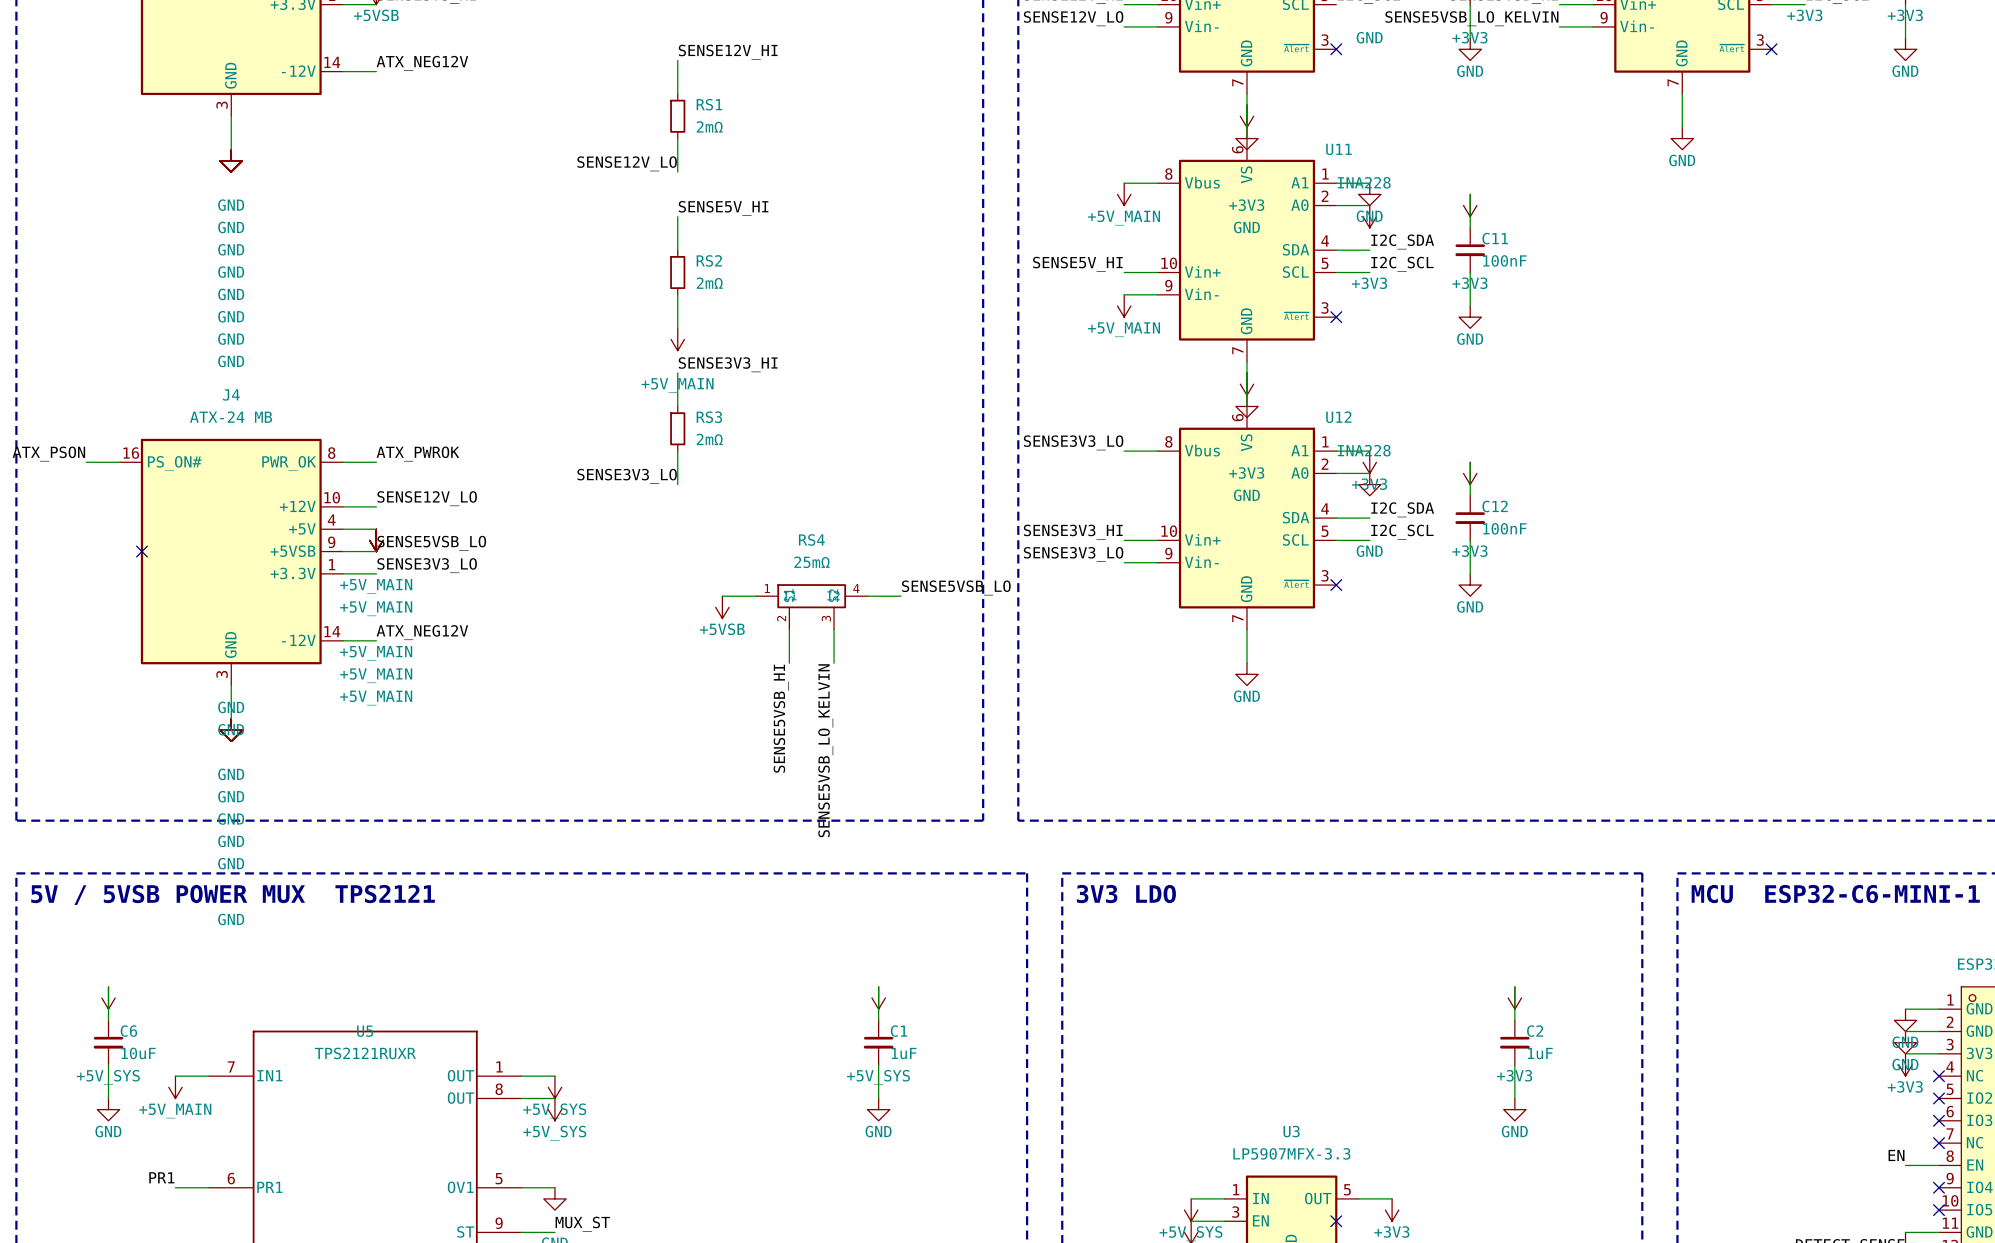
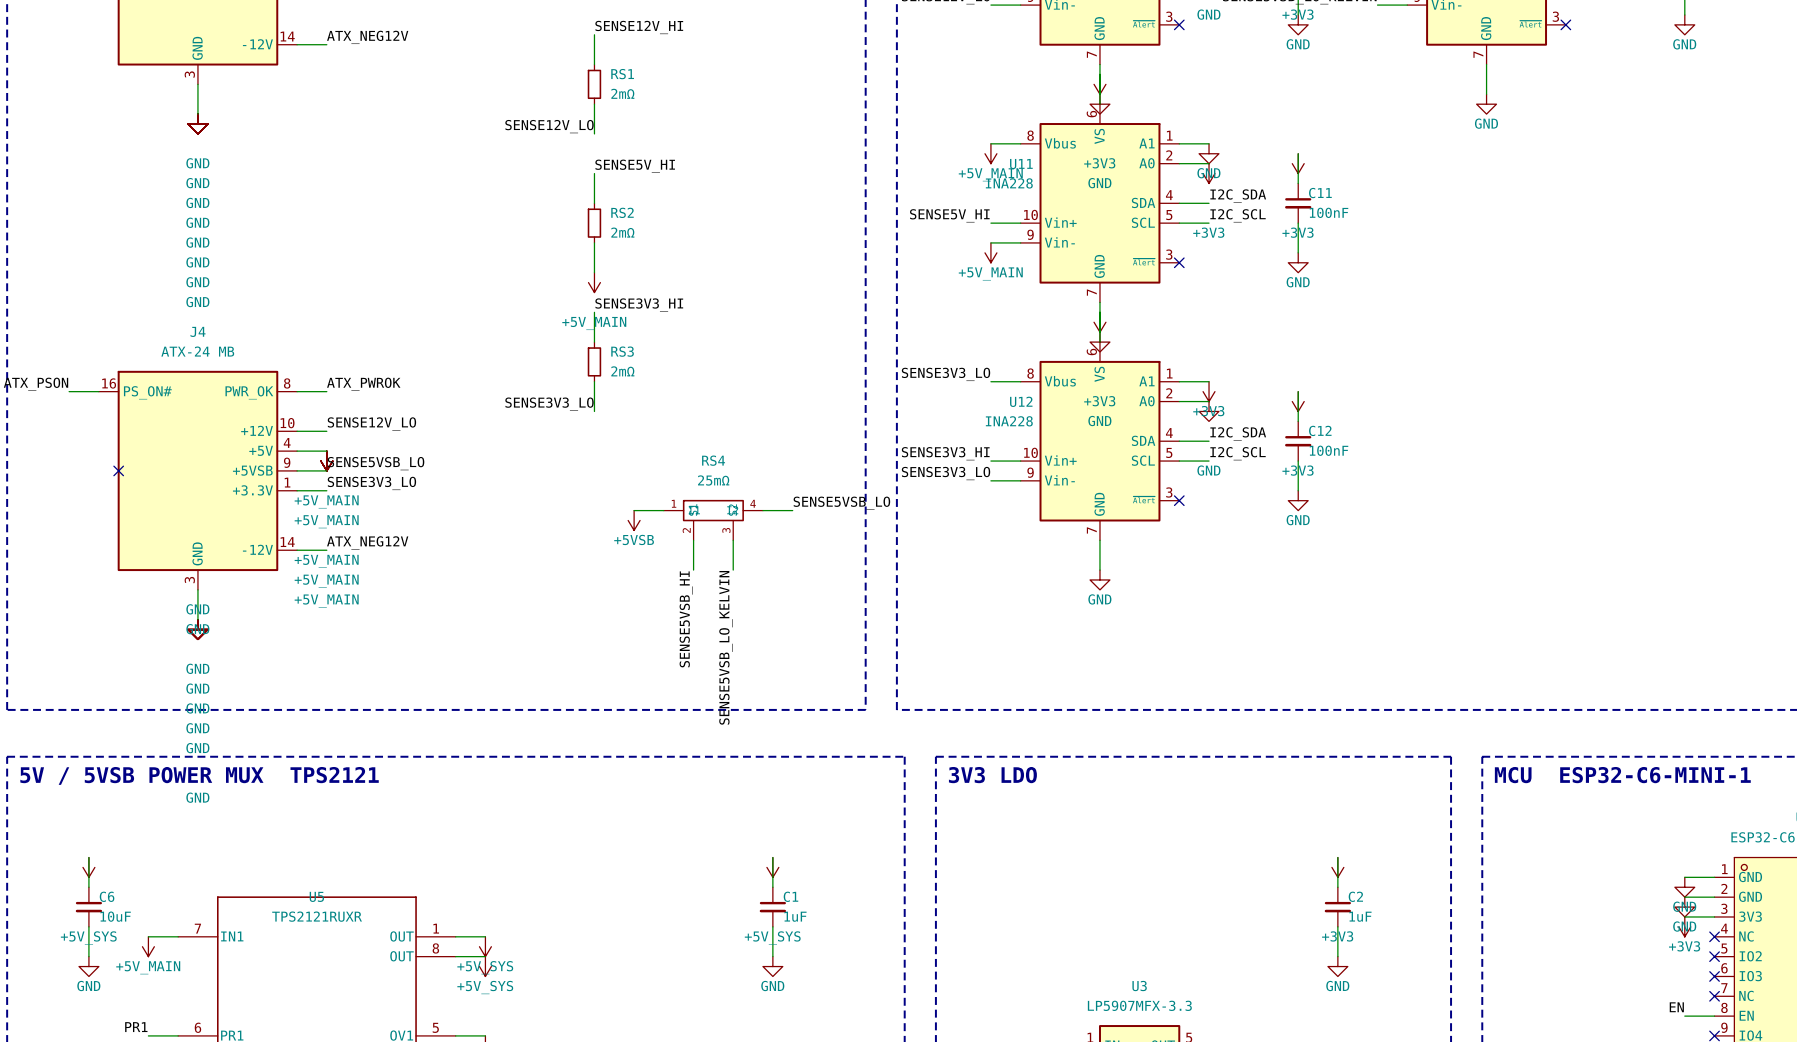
U11 name position: U11 (1338, 149) -> U11 (1021, 164)
U11 value position: INA228 (1364, 182) -> INA228 (1009, 183)
U12 name position: U12 (1338, 417) -> U12 (1021, 401)
U12 value position: INA228 (1364, 450) -> INA228 (1009, 421)

